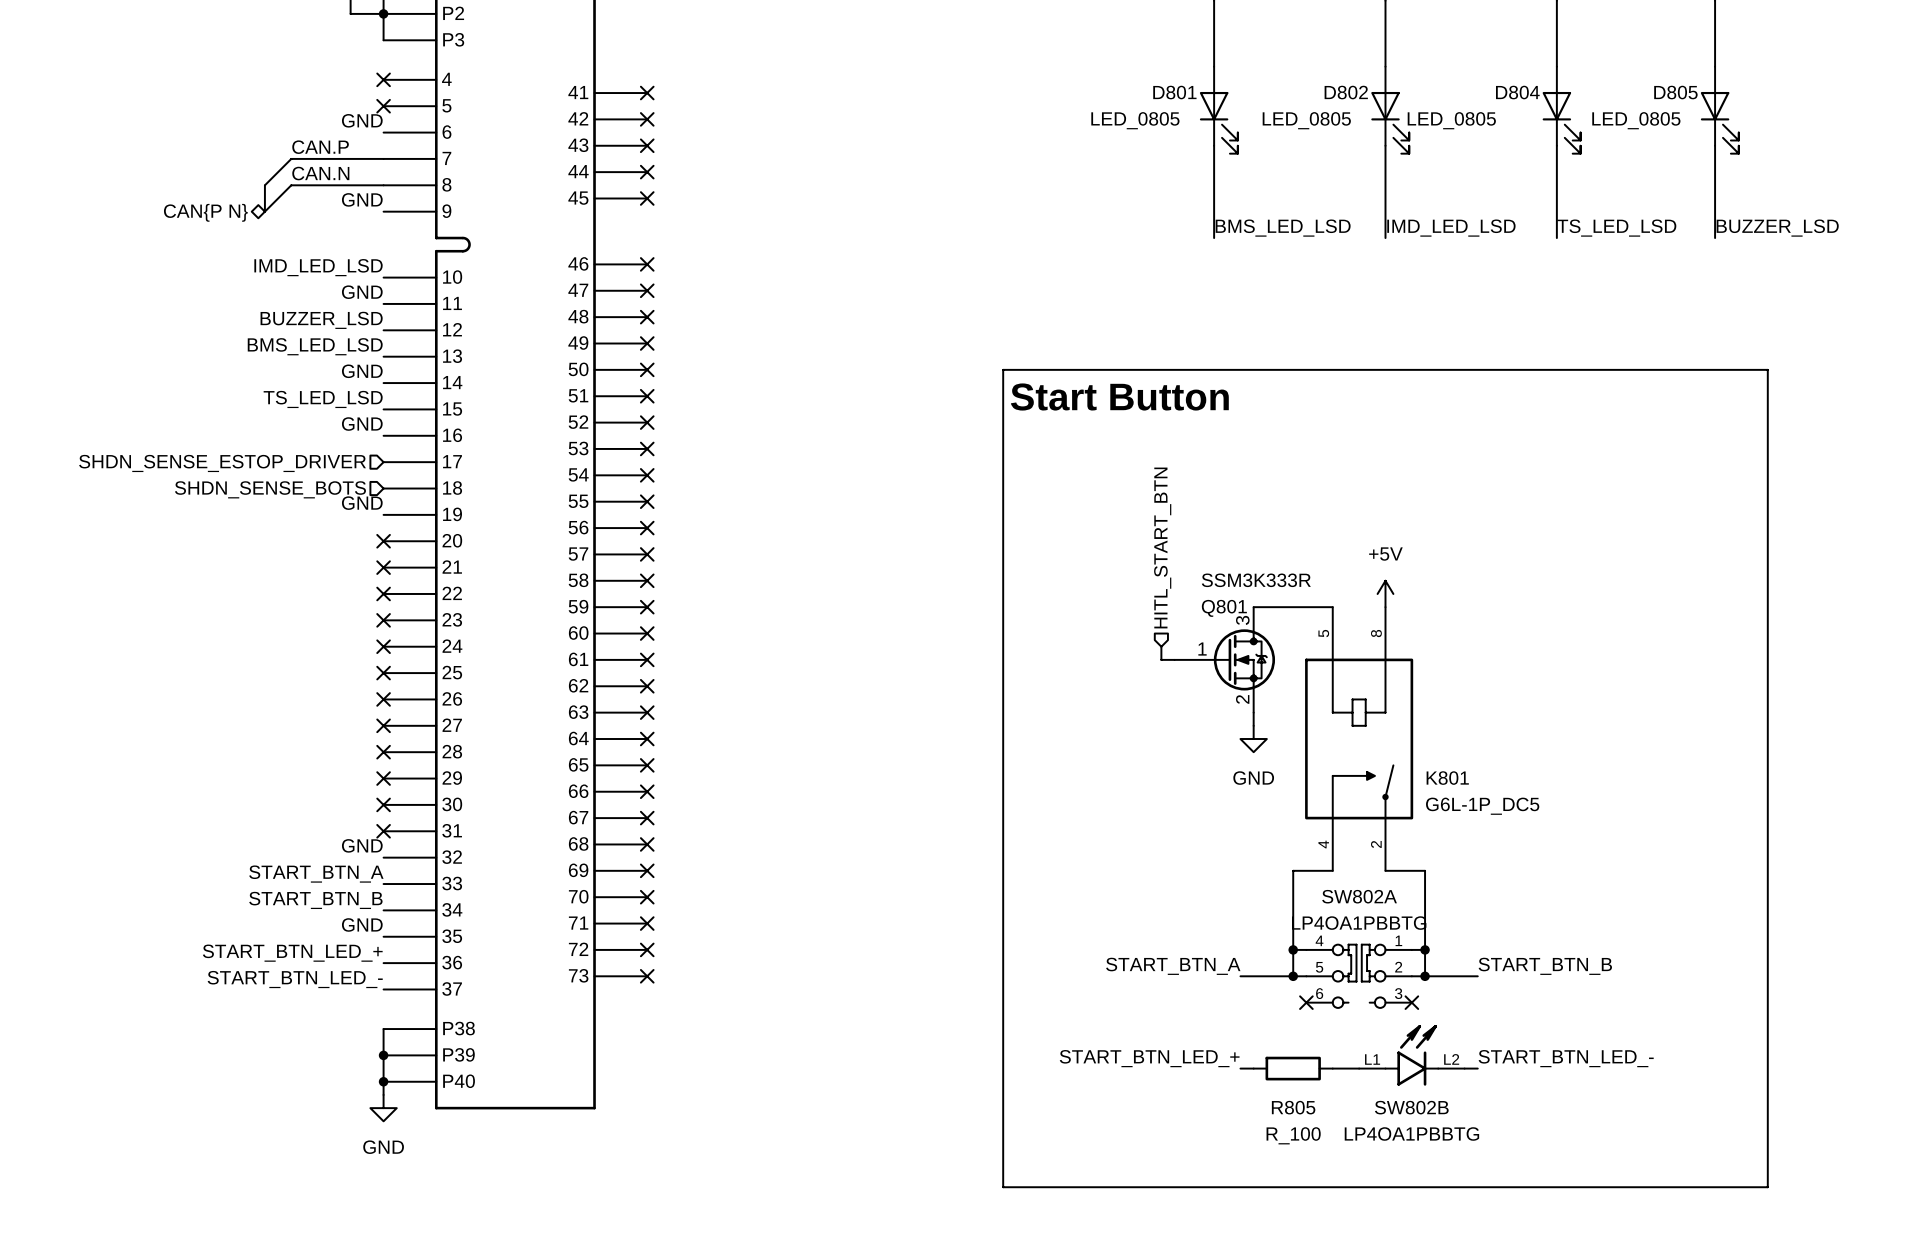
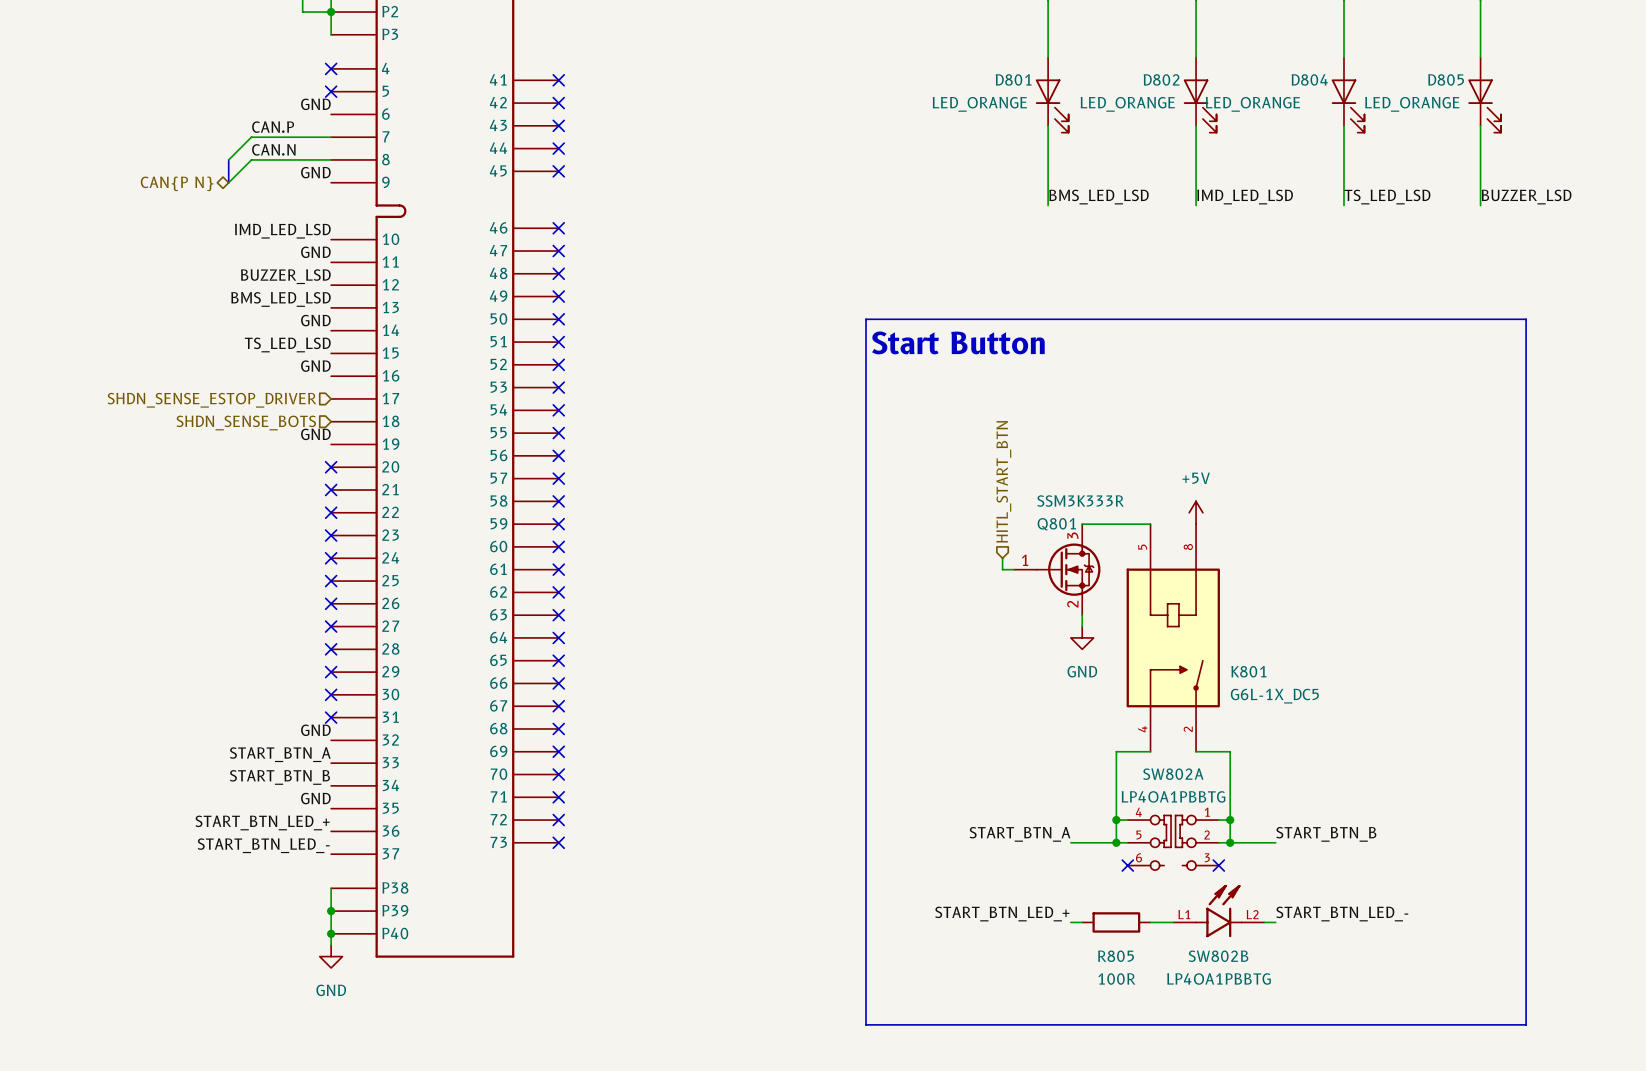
D801 value: LED_0805 (1135, 120) -> LED_ORANGE (979, 104)
D802 value: LED_0805 (1306, 120) -> LED_ORANGE (1127, 104)
D804 value: LED_0805 (1451, 120) -> LED_ORANGE (1252, 104)
D805 value: LED_0805 (1636, 120) -> LED_ORANGE (1412, 104)
Q801 symbol: [1174, 607, 1276, 713] -> [1013, 524, 1101, 616]
K801 value: G6L-1P_DC5 (1482, 806) -> G6L-1X_DC5 (1274, 696)
R805 value: R_100 (1293, 1135) -> 100R (1116, 979)

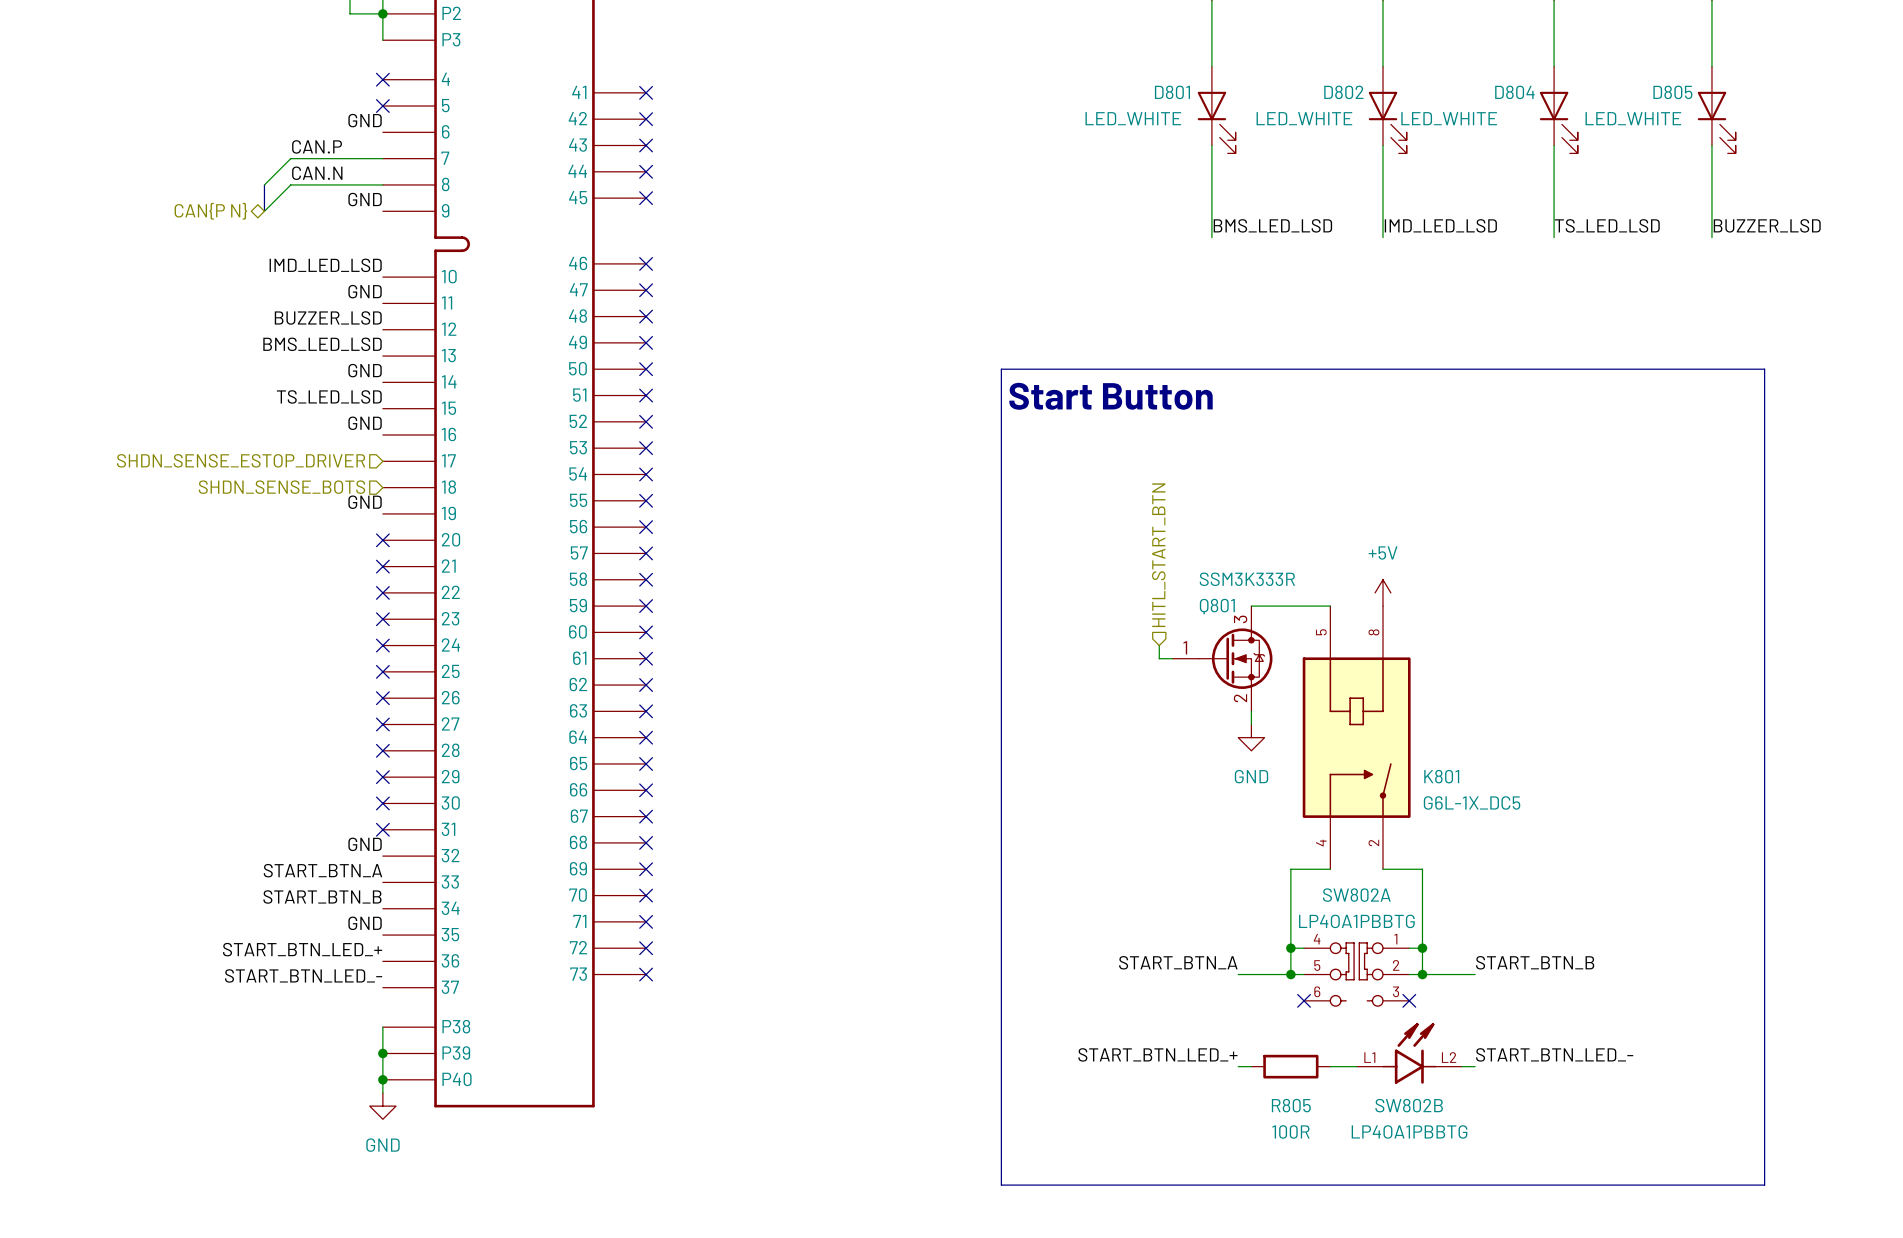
D801 value: LED_ORANGE (979, 104) -> LED_WHITE (1133, 118)
D802 value: LED_ORANGE (1127, 104) -> LED_WHITE (1304, 118)
D804 value: LED_ORANGE (1252, 104) -> LED_WHITE (1449, 118)
D805 value: LED_ORANGE (1412, 104) -> LED_WHITE (1633, 118)

